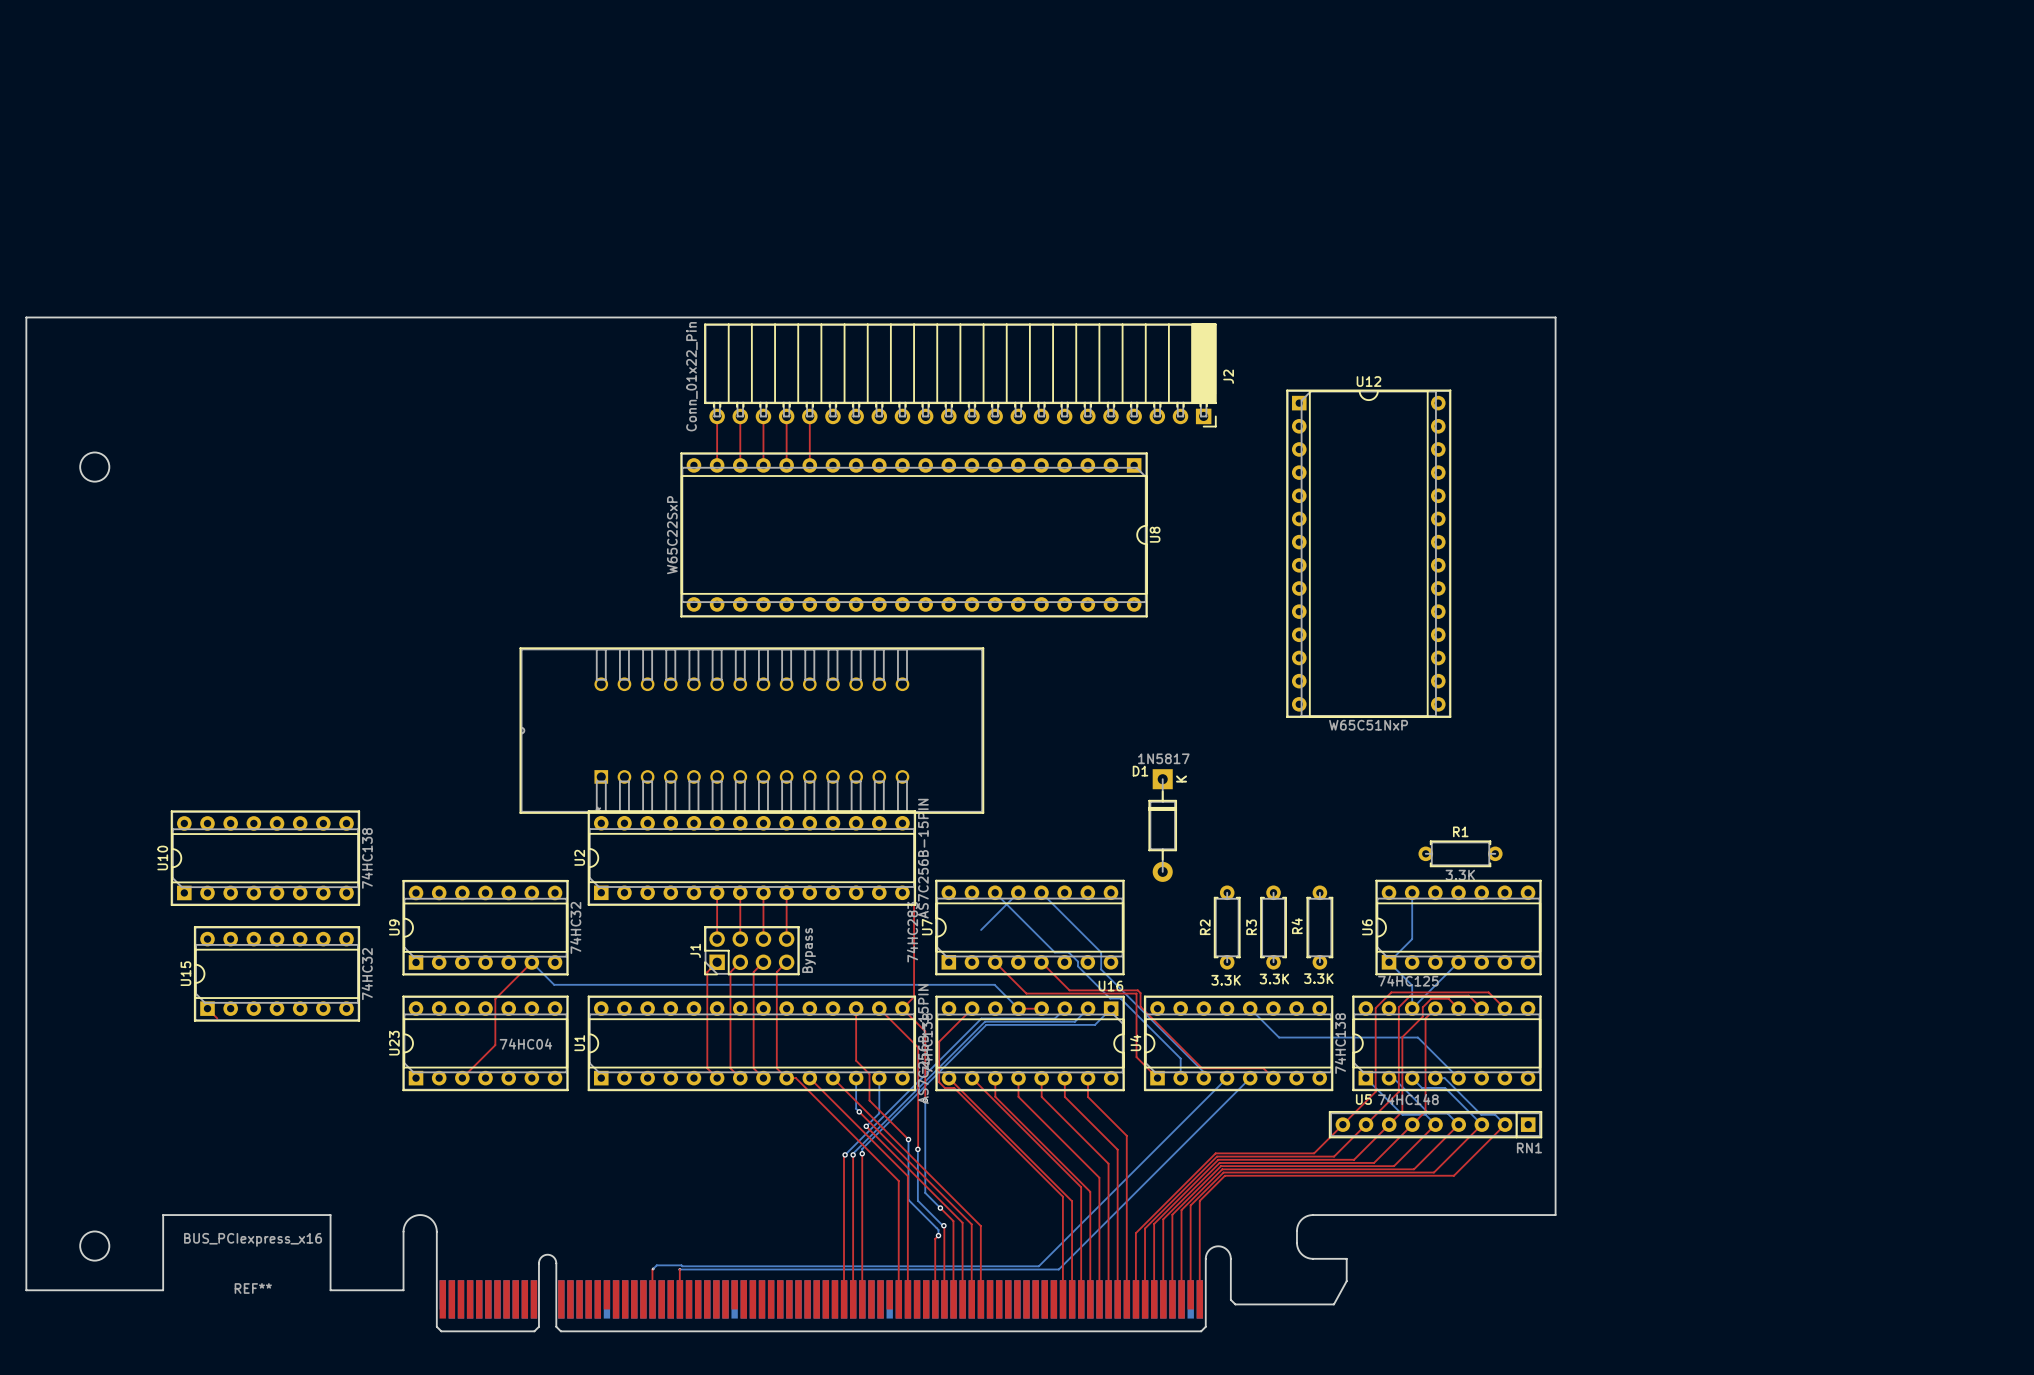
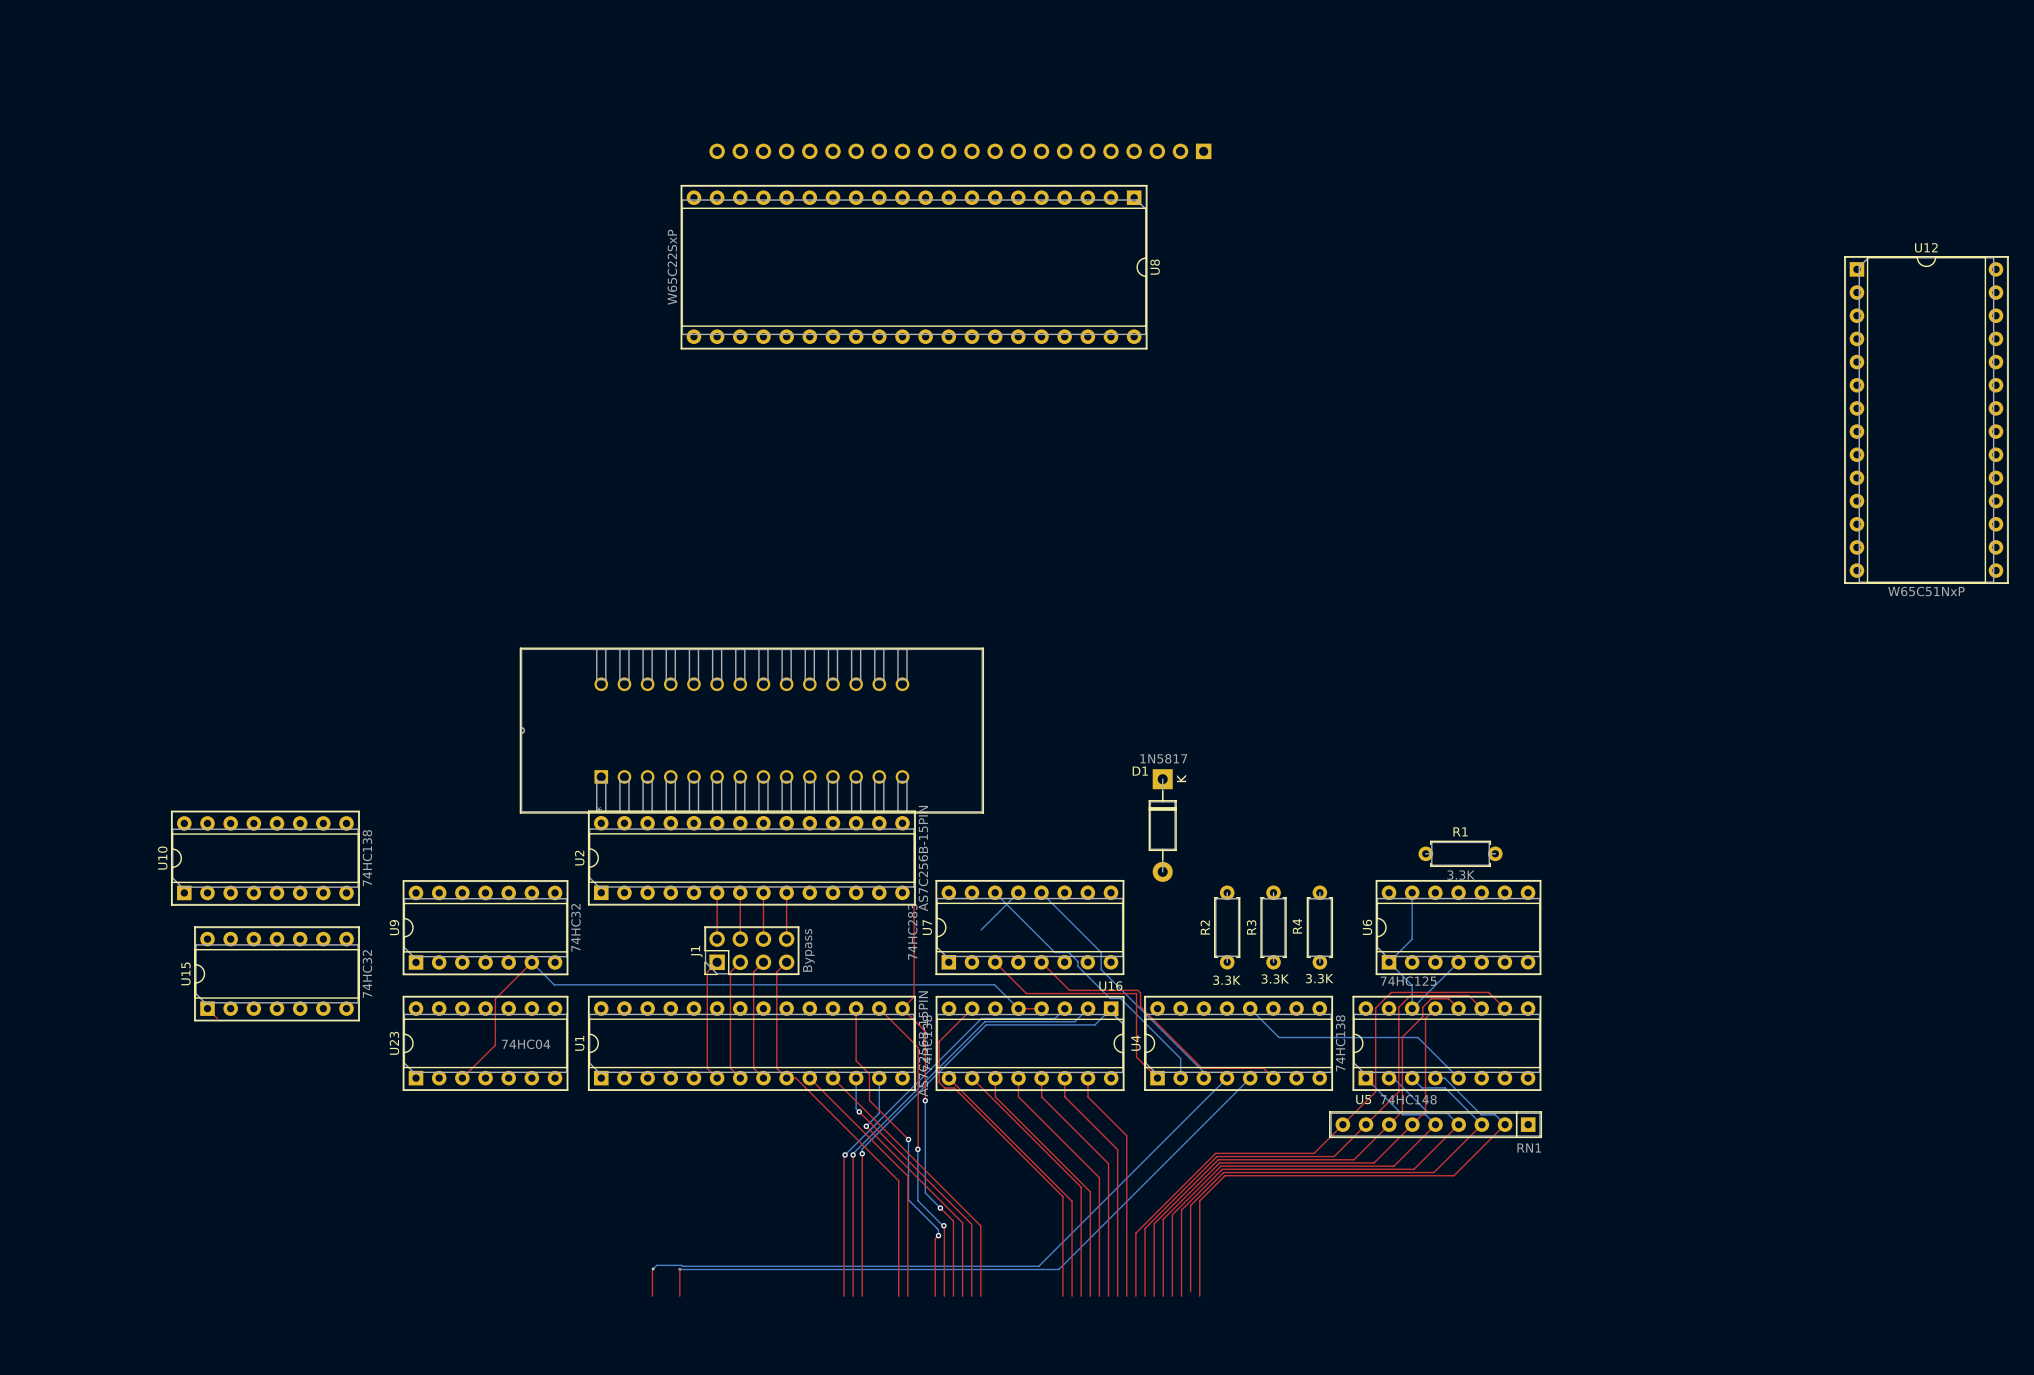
J2 side: top (960, 375) -> bottom (960, 151)
top track: (717, 416) (717, 465) -> none
top track: (740, 416) (740, 465) -> none
top track: (763, 416) (763, 465) -> none
top track: (786, 416) (786, 465) -> none
top track: (809, 416) (809, 465) -> none
U8 position: (914, 534) -> (914, 267)
U12 position: (1368, 553) -> (1926, 420)
REF**: BUS_PCIexpress_x16 (790, 824) -> none

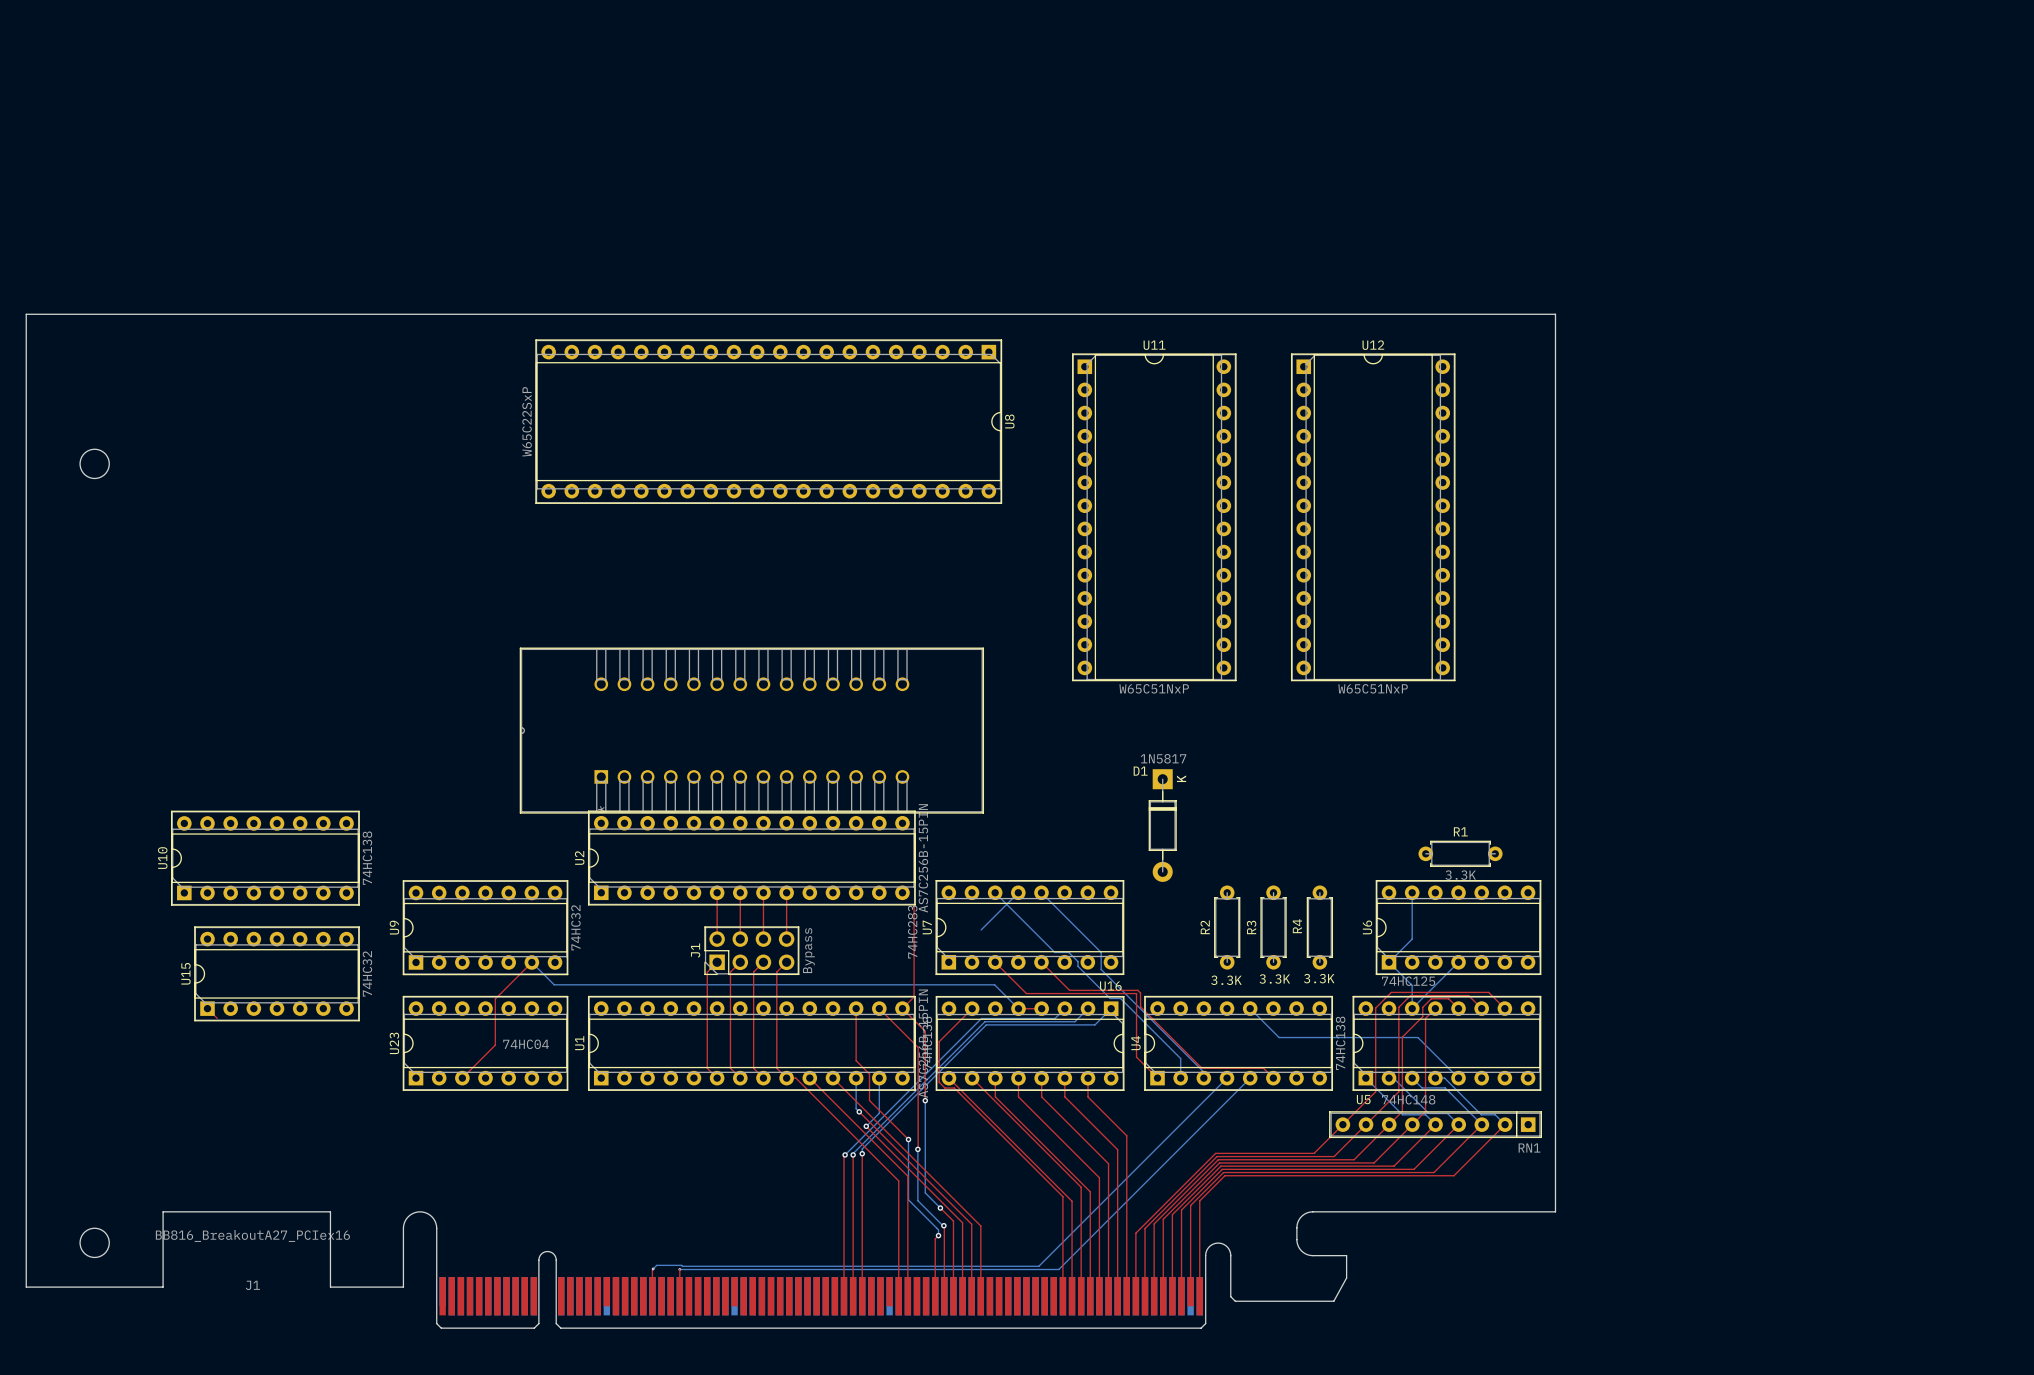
part: (960, 151) -> none
U8 position: (914, 267) -> (768, 421)
U12 position: (1926, 420) -> (1373, 517)
U11: none -> W65C51NxP (1154, 517)
J1: none -> BB816_BreakoutA27_PCIex16 (790, 821)

